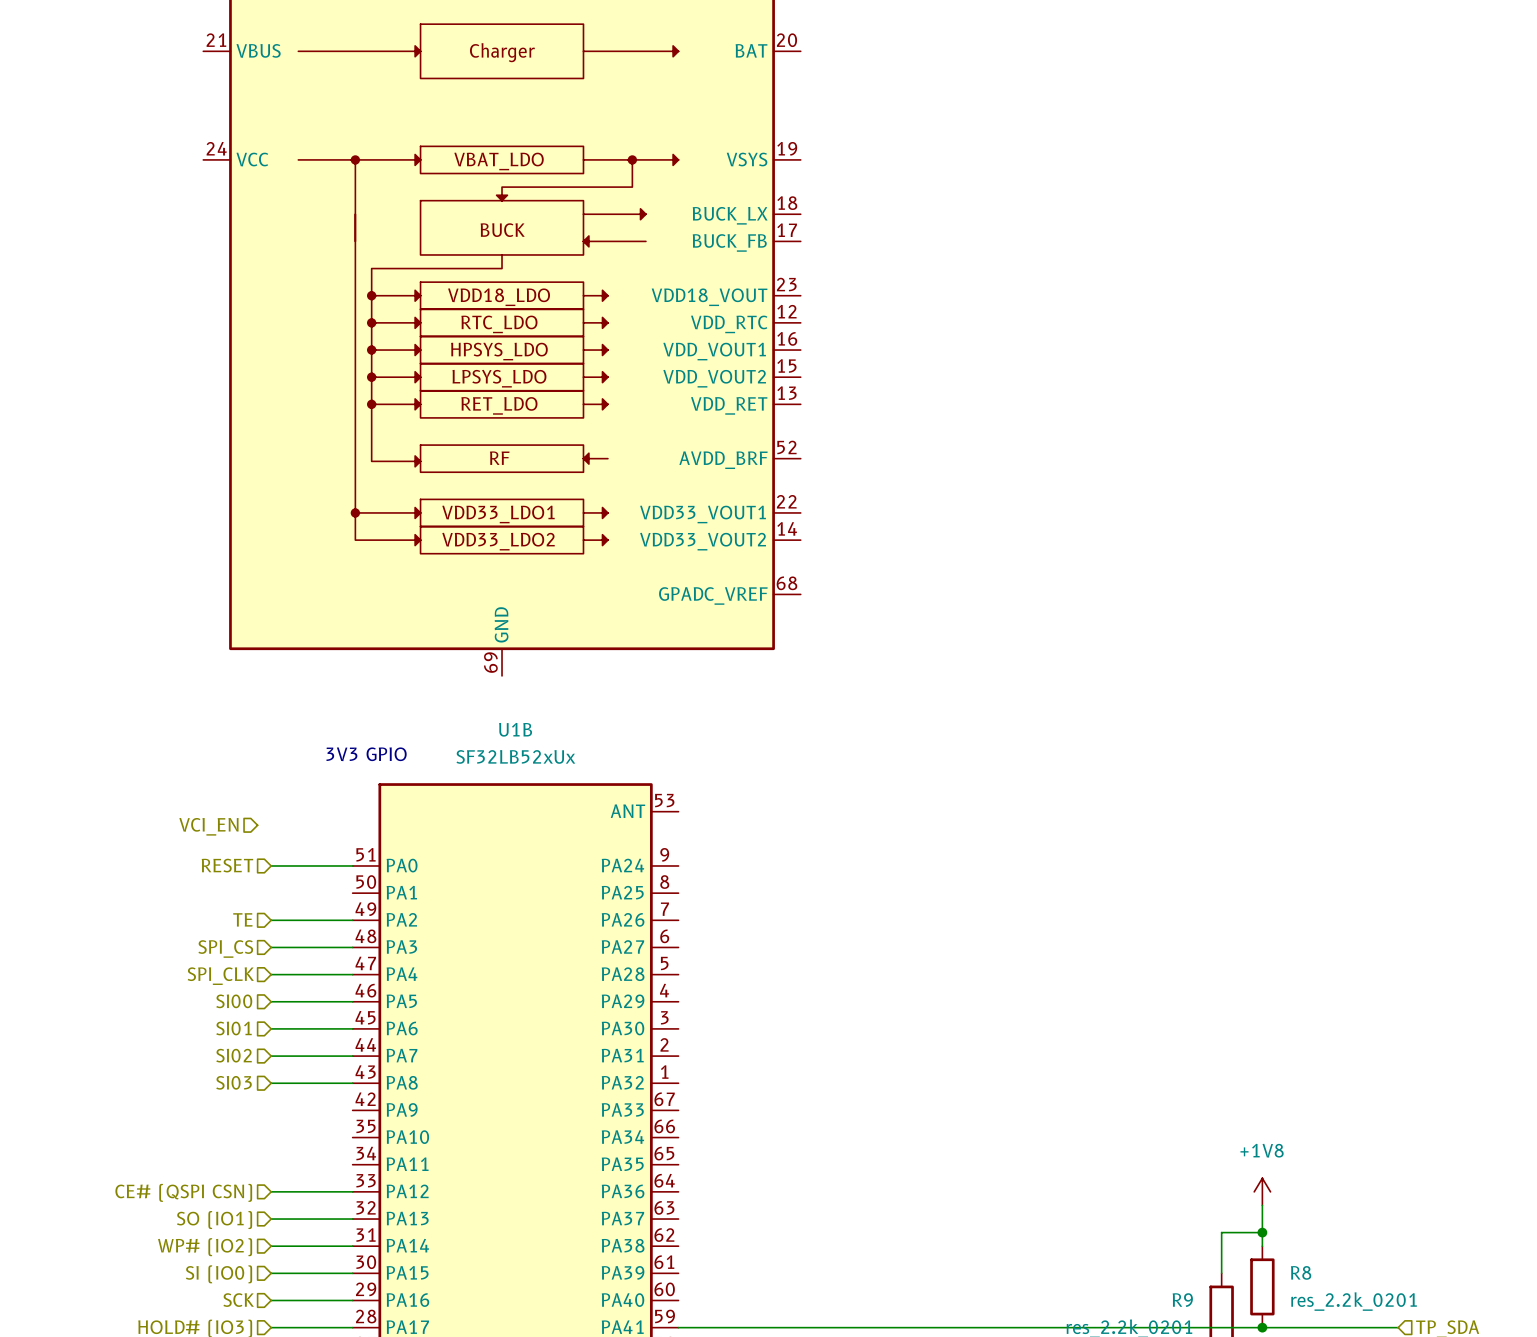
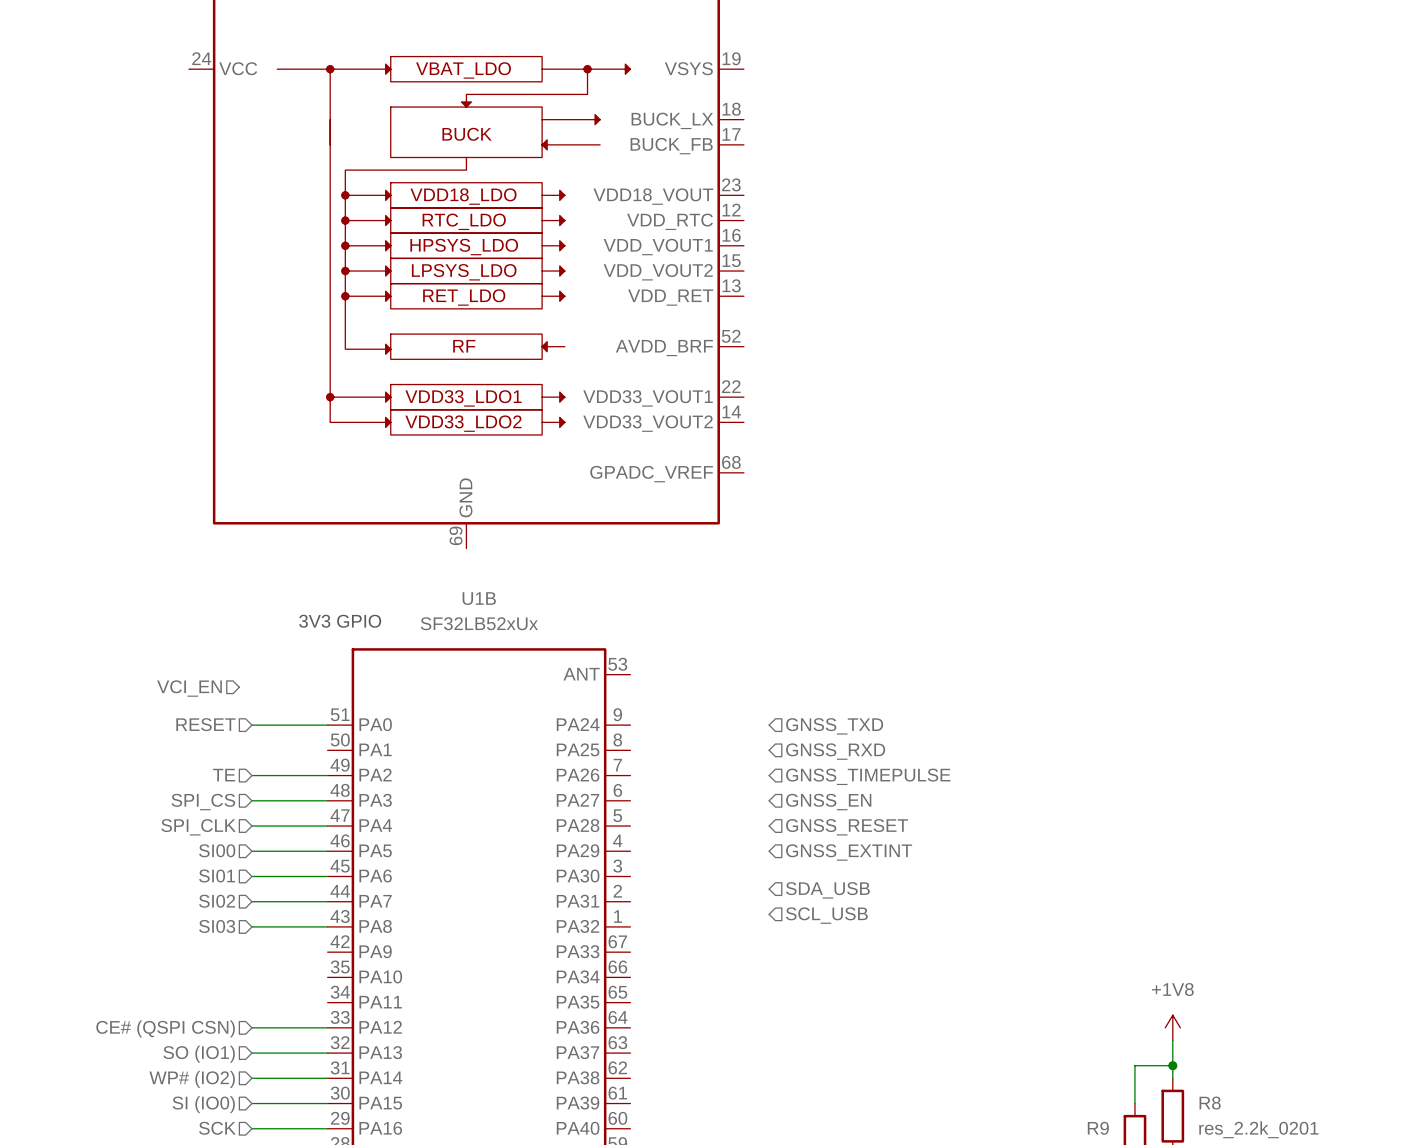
hierarchical label: none -> GNSS_TXD (834, 726)
hierarchical label: none -> GNSS_RXD (835, 751)
hierarchical label: none -> GNSS_TIMEPULSE (868, 776)
hierarchical label: none -> GNSS_EN (828, 802)
hierarchical label: none -> GNSS_RESET (847, 827)
hierarchical label: none -> GNSS_EXTINT (849, 852)
hierarchical label: none -> SDA_USB (827, 890)
hierarchical label: none -> SCL_USB (826, 915)

